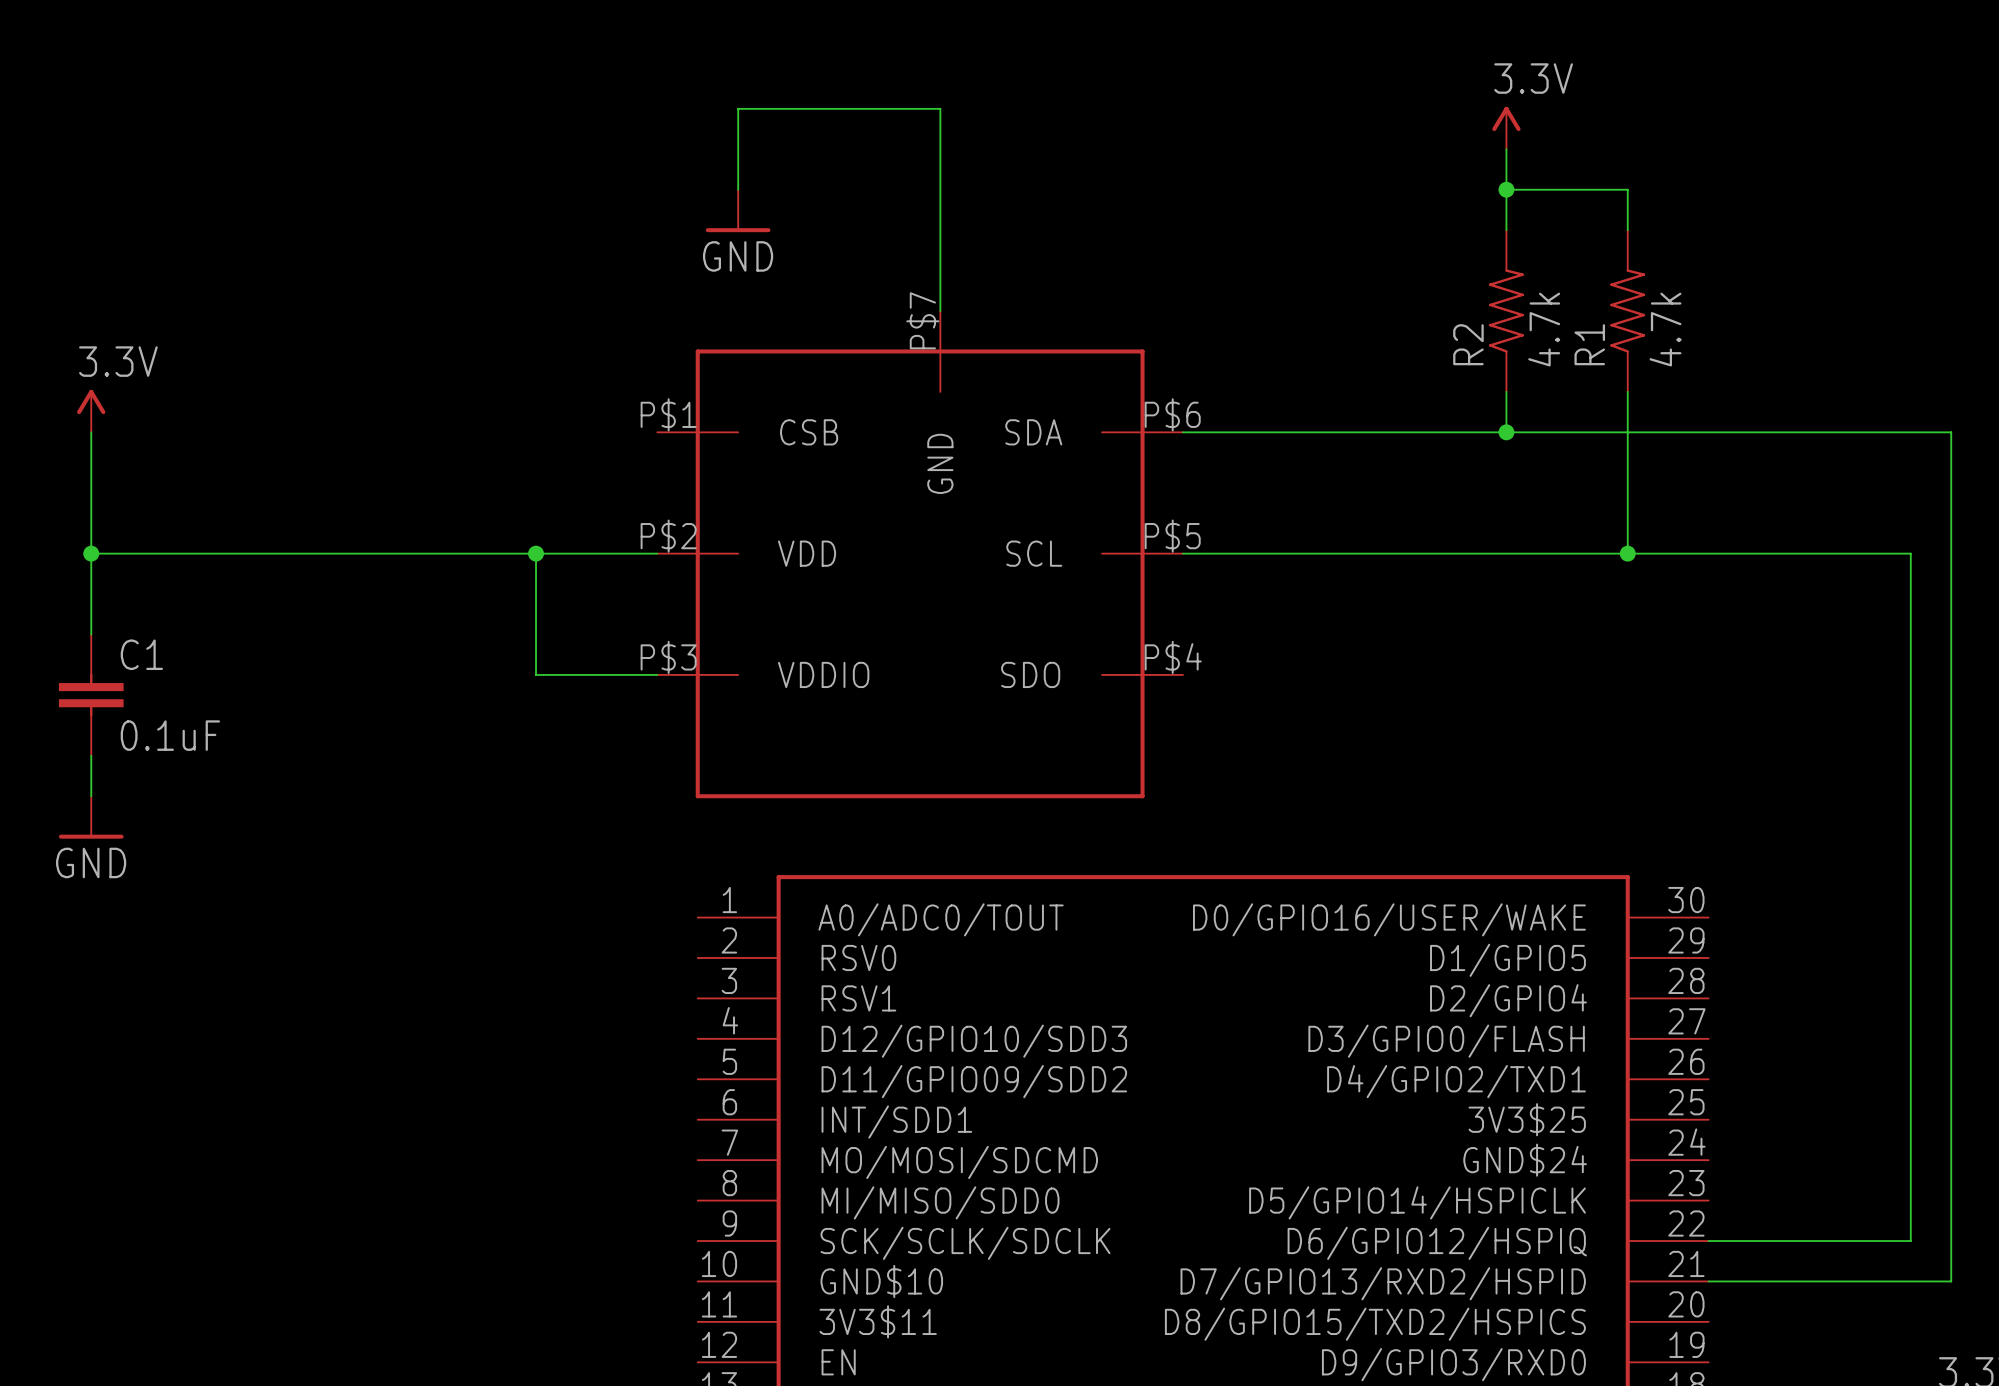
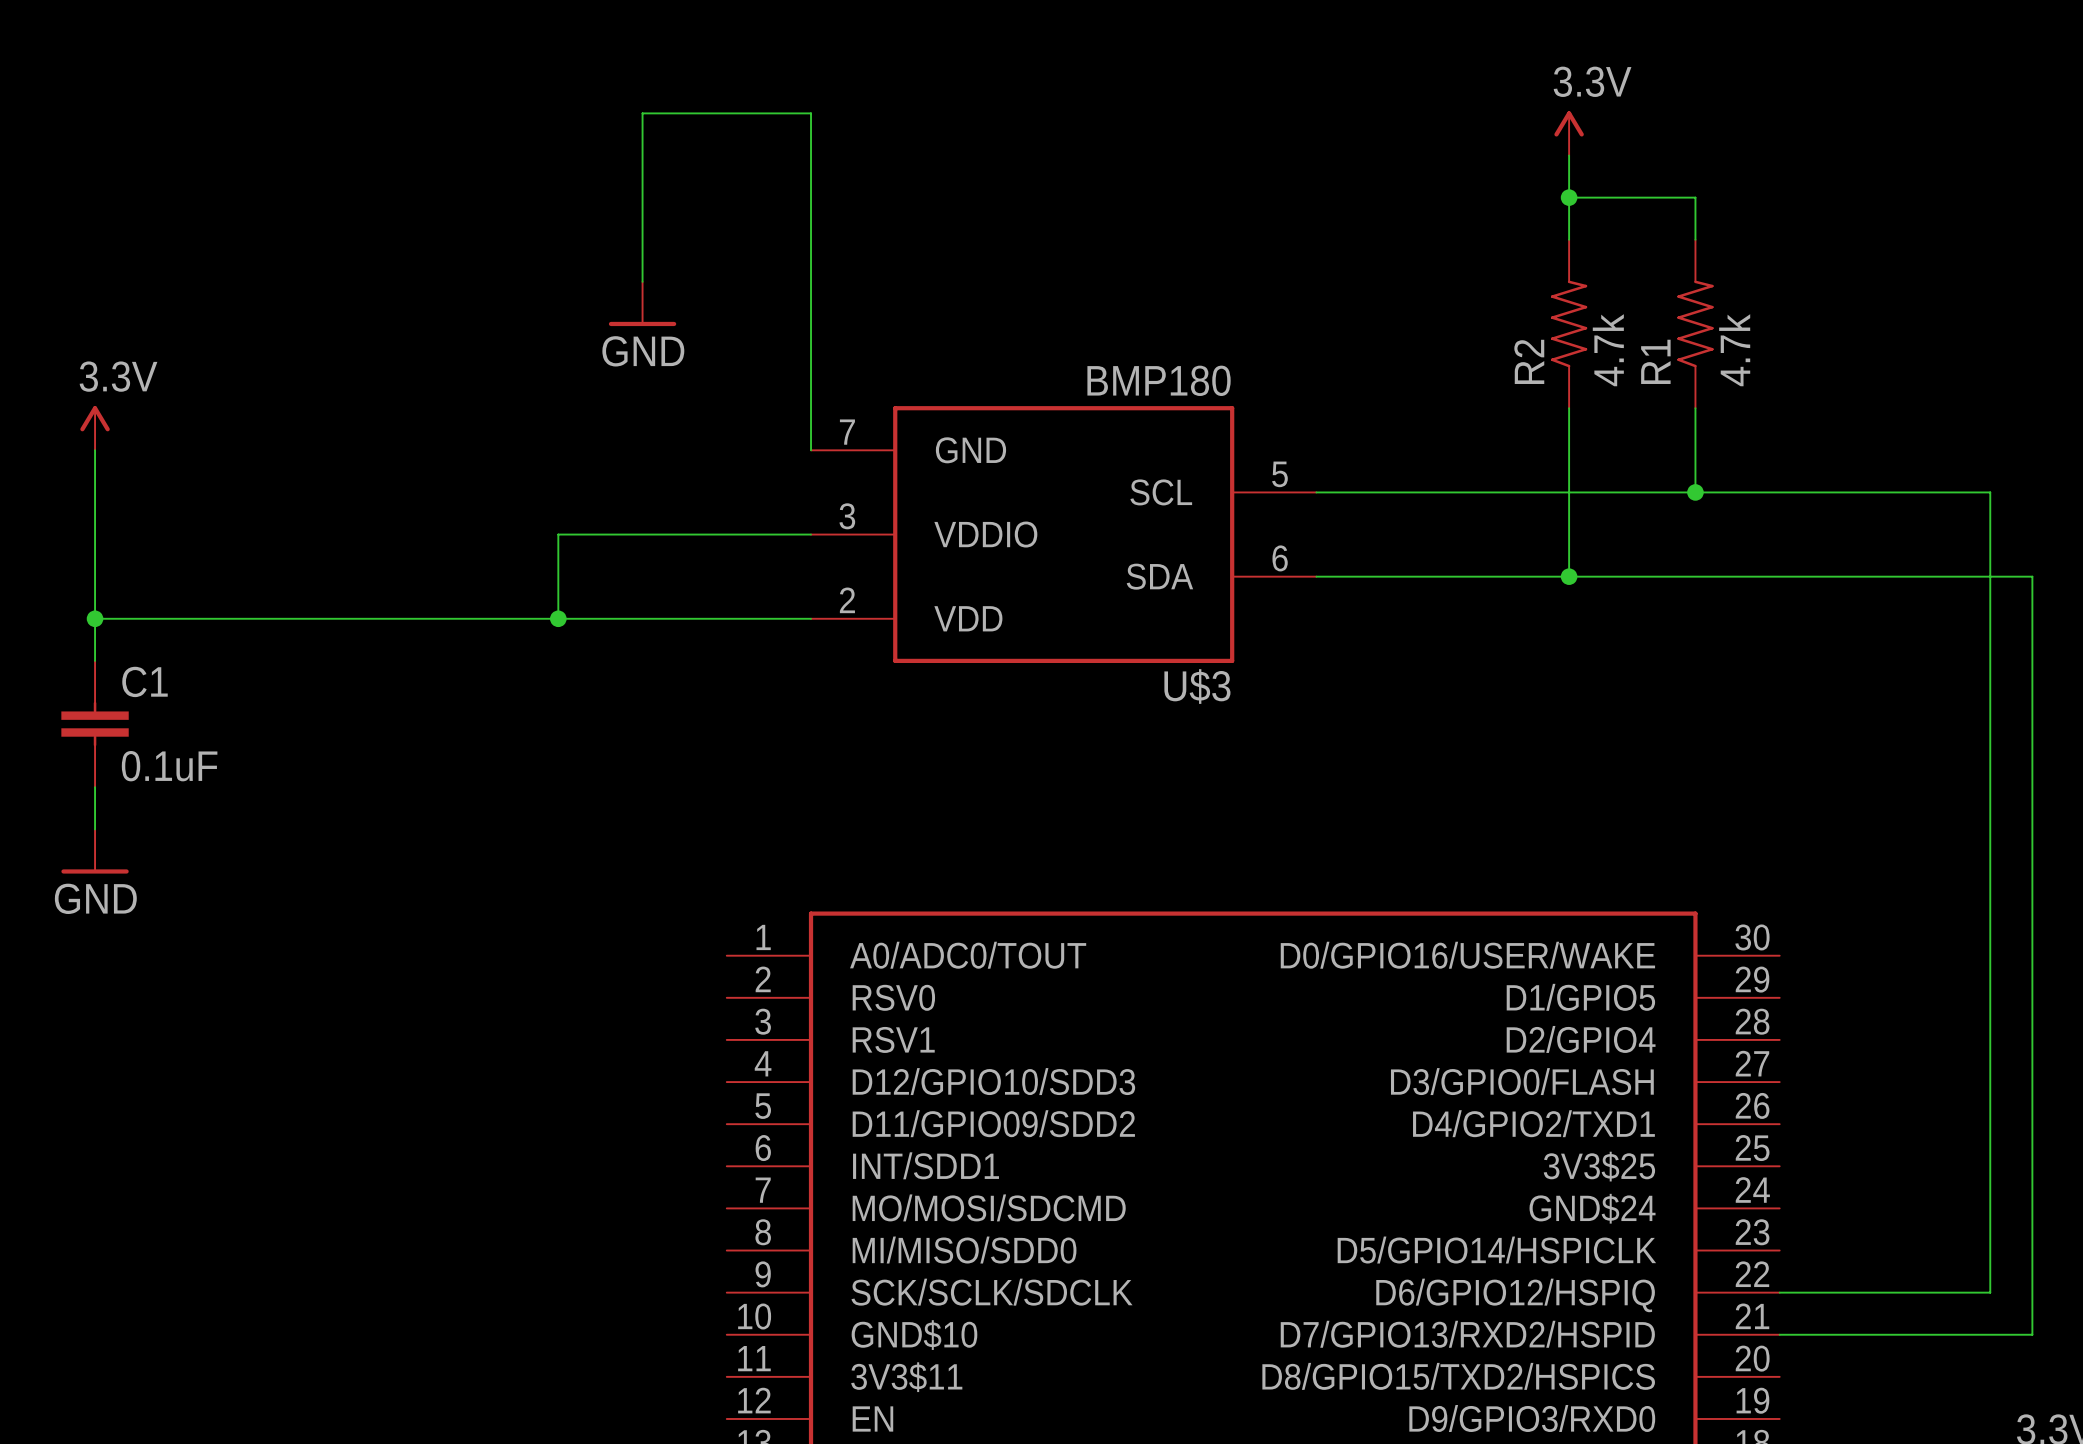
wire: (738, 108) (738, 189) -> (768, 113) (642, 113) (642, 281)
wire: (778, 108) (940, 108) (940, 311) -> (811, 113) (811, 450)
power symbol position: GND (738, 210) -> GND (642, 303)
wire: (1182, 432) (1951, 432) (1951, 553) -> (1316, 492) (1990, 492) (1990, 576) (2032, 576)
wire: none -> (1569, 450) (1569, 576)
junction: (1506, 432) -> none
wire: (1627, 472) (1627, 553) -> none
junction: none -> (1695, 492)
wire: none -> (811, 534) (558, 534) (558, 576)
U$3: none -> BMP180 (1063, 534)
wire: (91, 553) (657, 553) -> none
junction position: (91, 553) -> (95, 618)
junction position: (536, 553) -> (558, 618)
junction: none -> (1569, 576)
junction: (1627, 553) -> none
part: (920, 554) -> none
wire: none -> (95, 618) (811, 618)
wire: (536, 594) (536, 674) (657, 674) -> none

